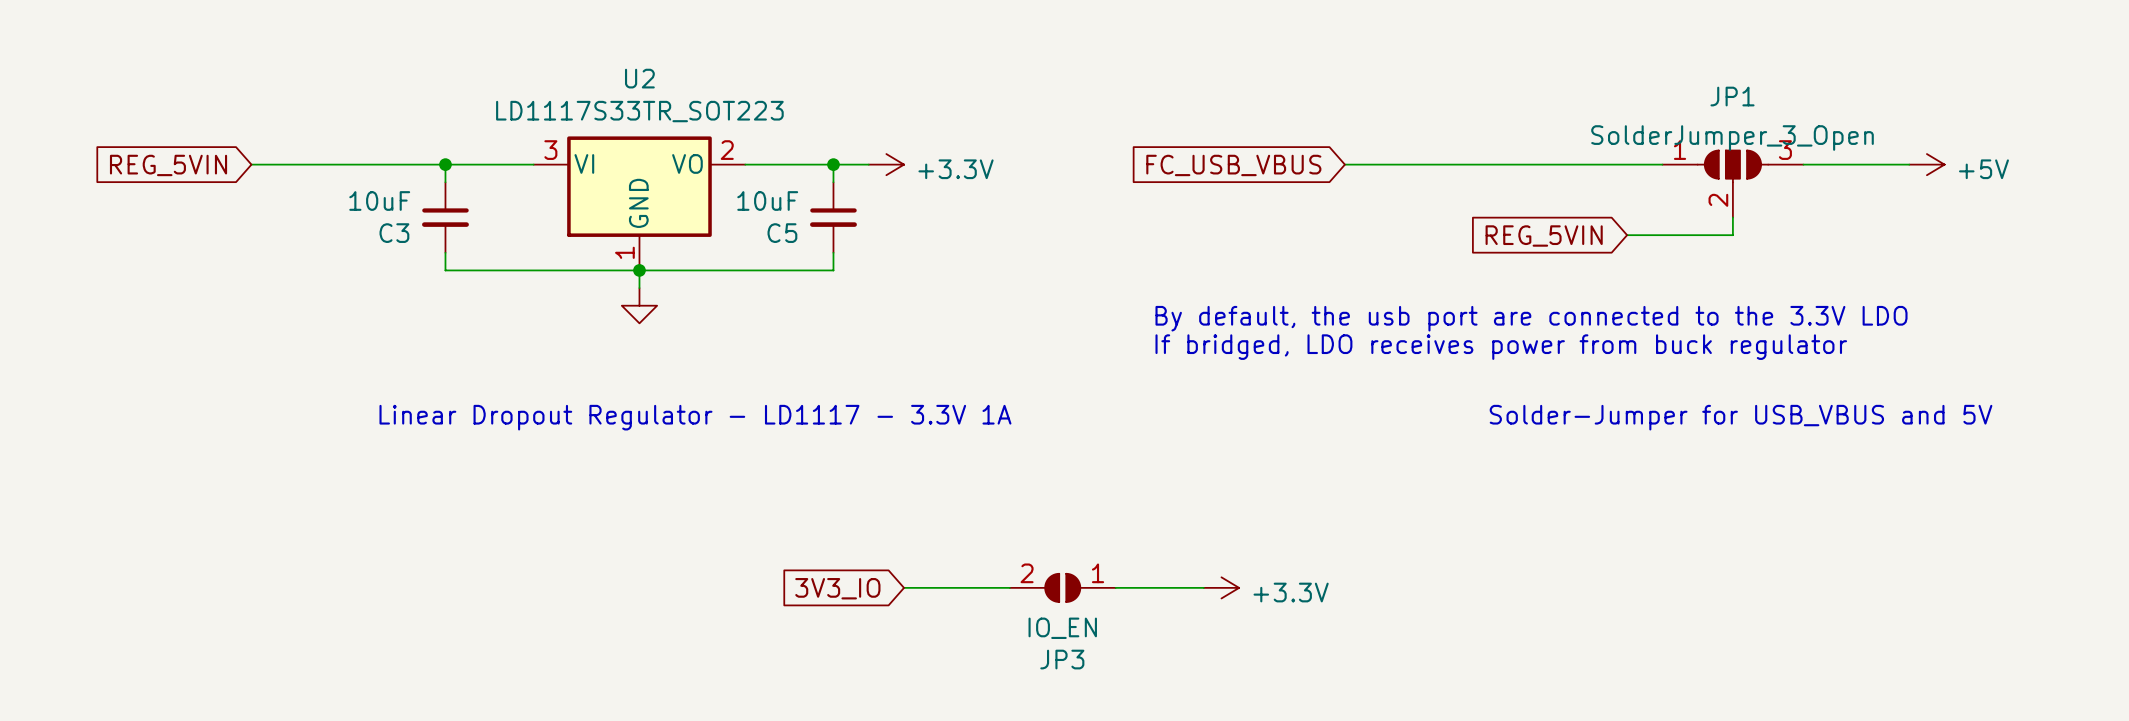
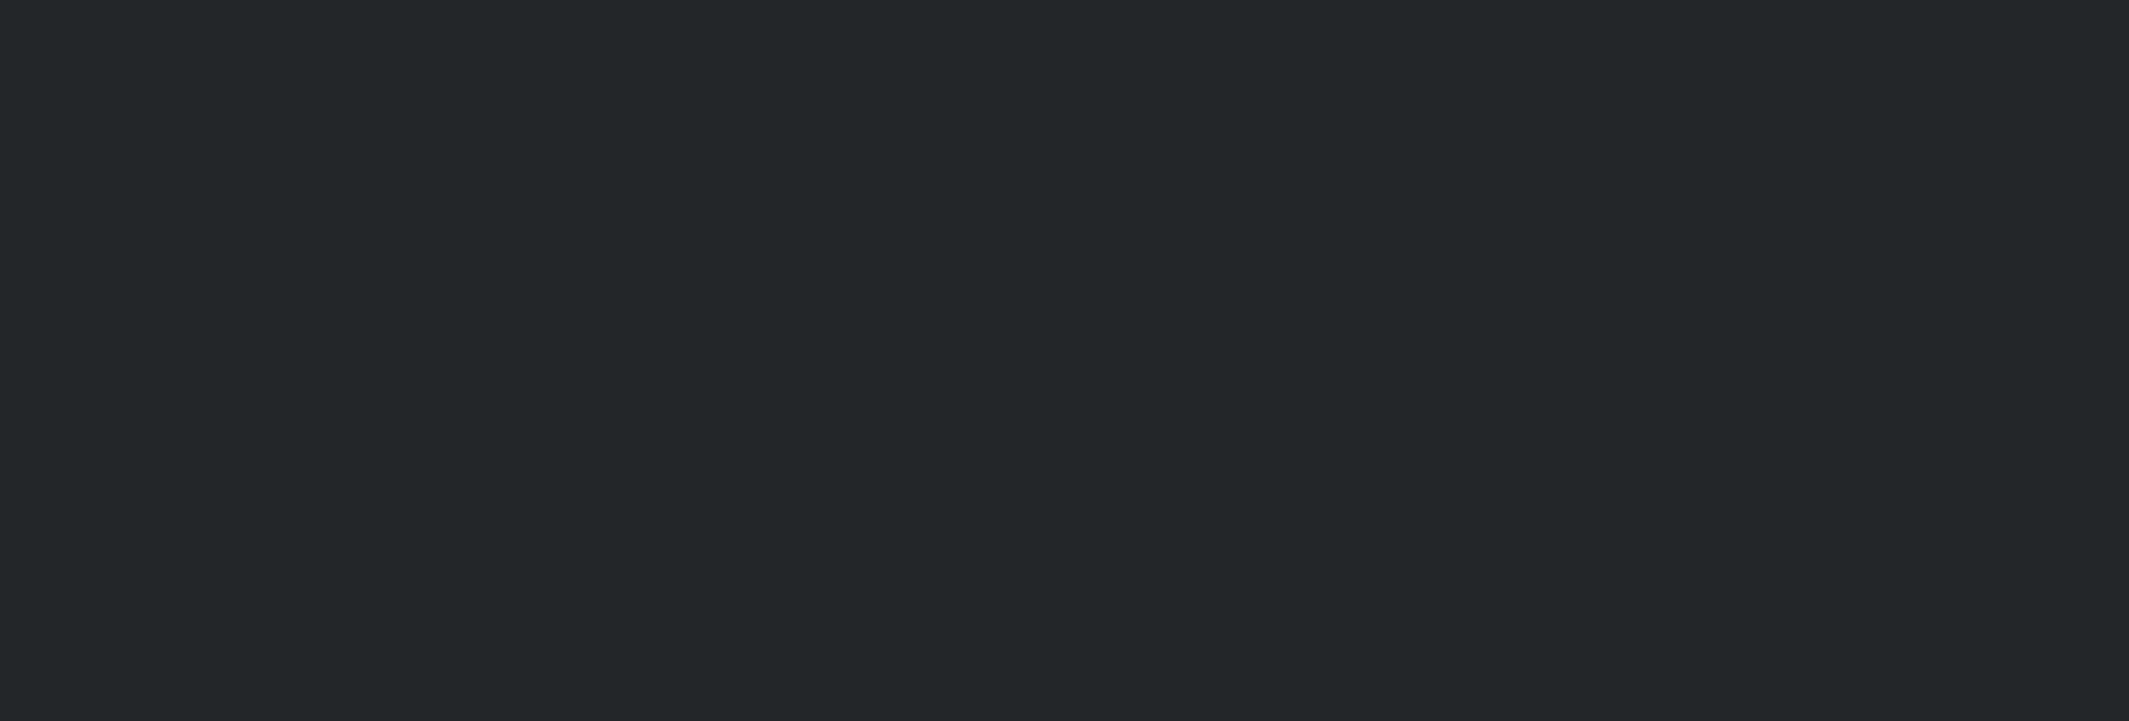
wire: (251, 164) (533, 164) -> none
wire: (445, 164) (445, 182) -> none
junction: (445, 164) -> none
wire: (745, 164) (868, 164) -> none
wire: (833, 164) (833, 182) -> none
junction: (833, 164) -> none
power symbol: +3.3V (886, 164) -> none
wire: (1344, 164) (1662, 164) -> none
wire: (1803, 164) (1909, 164) -> none
power symbol: +5V (1926, 164) -> none
global label: REG_5VIN (168, 165) -> none
global label: FC_USB_VBUS (1233, 165) -> none
JP1: SolderJumper_3_Open (1732, 184) -> none
U2: LD1117S33TR_SOT223 (639, 203) -> none
C3: 10uF (445, 217) -> none
C5: 10uF (833, 217) -> none
wire: (1732, 217) (1732, 235) (1627, 235) -> none
global label: REG_5VIN (1544, 236) -> none
wire: (445, 252) (445, 270) (833, 270) (833, 252) -> none
wire: (639, 270) (639, 288) -> none
junction: (639, 270) -> none
power symbol: (639, 305) -> none
text: By default, the usb port are connected to the 3.3V LDO (1531, 318) -> none
text: If bridged, LDO receives power from buck regulator (1501, 347) -> none
text: Linear Dropout Regulator - LD1117 - 3.3V 1A (695, 417) -> none
text: Solder-Jumper for USB_VBUS and 5V (1741, 417) -> none
wire: (904, 587) (1009, 587) -> none
JP3: IO_EN (1062, 587) -> none
wire: (1115, 587) (1203, 587) -> none
power symbol: +3.3V (1221, 587) -> none
global label: 3V3_IO (837, 588) -> none

